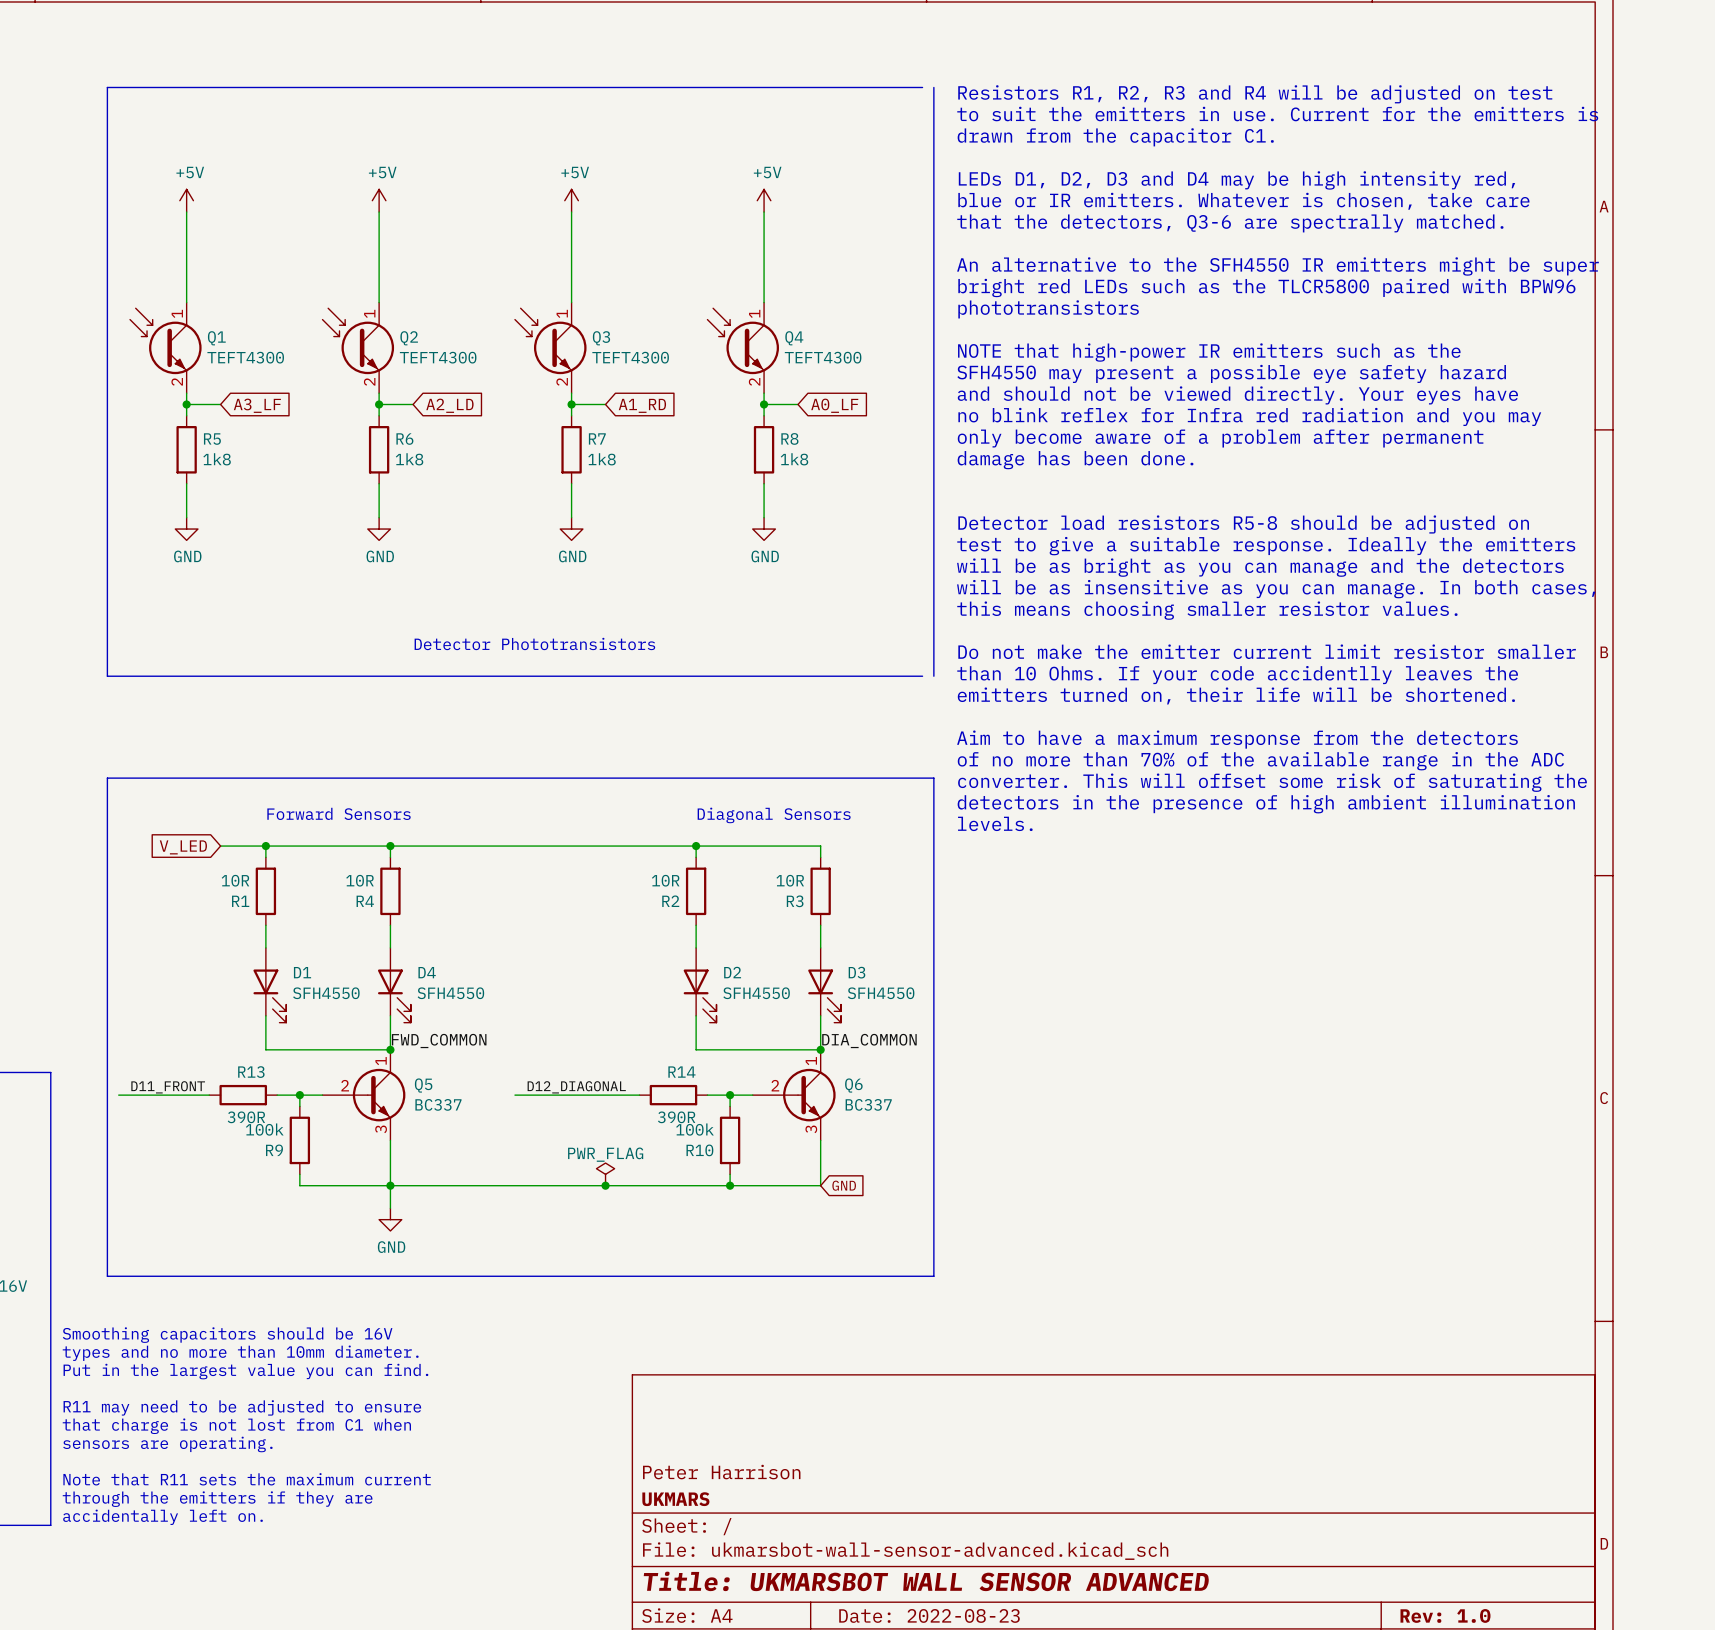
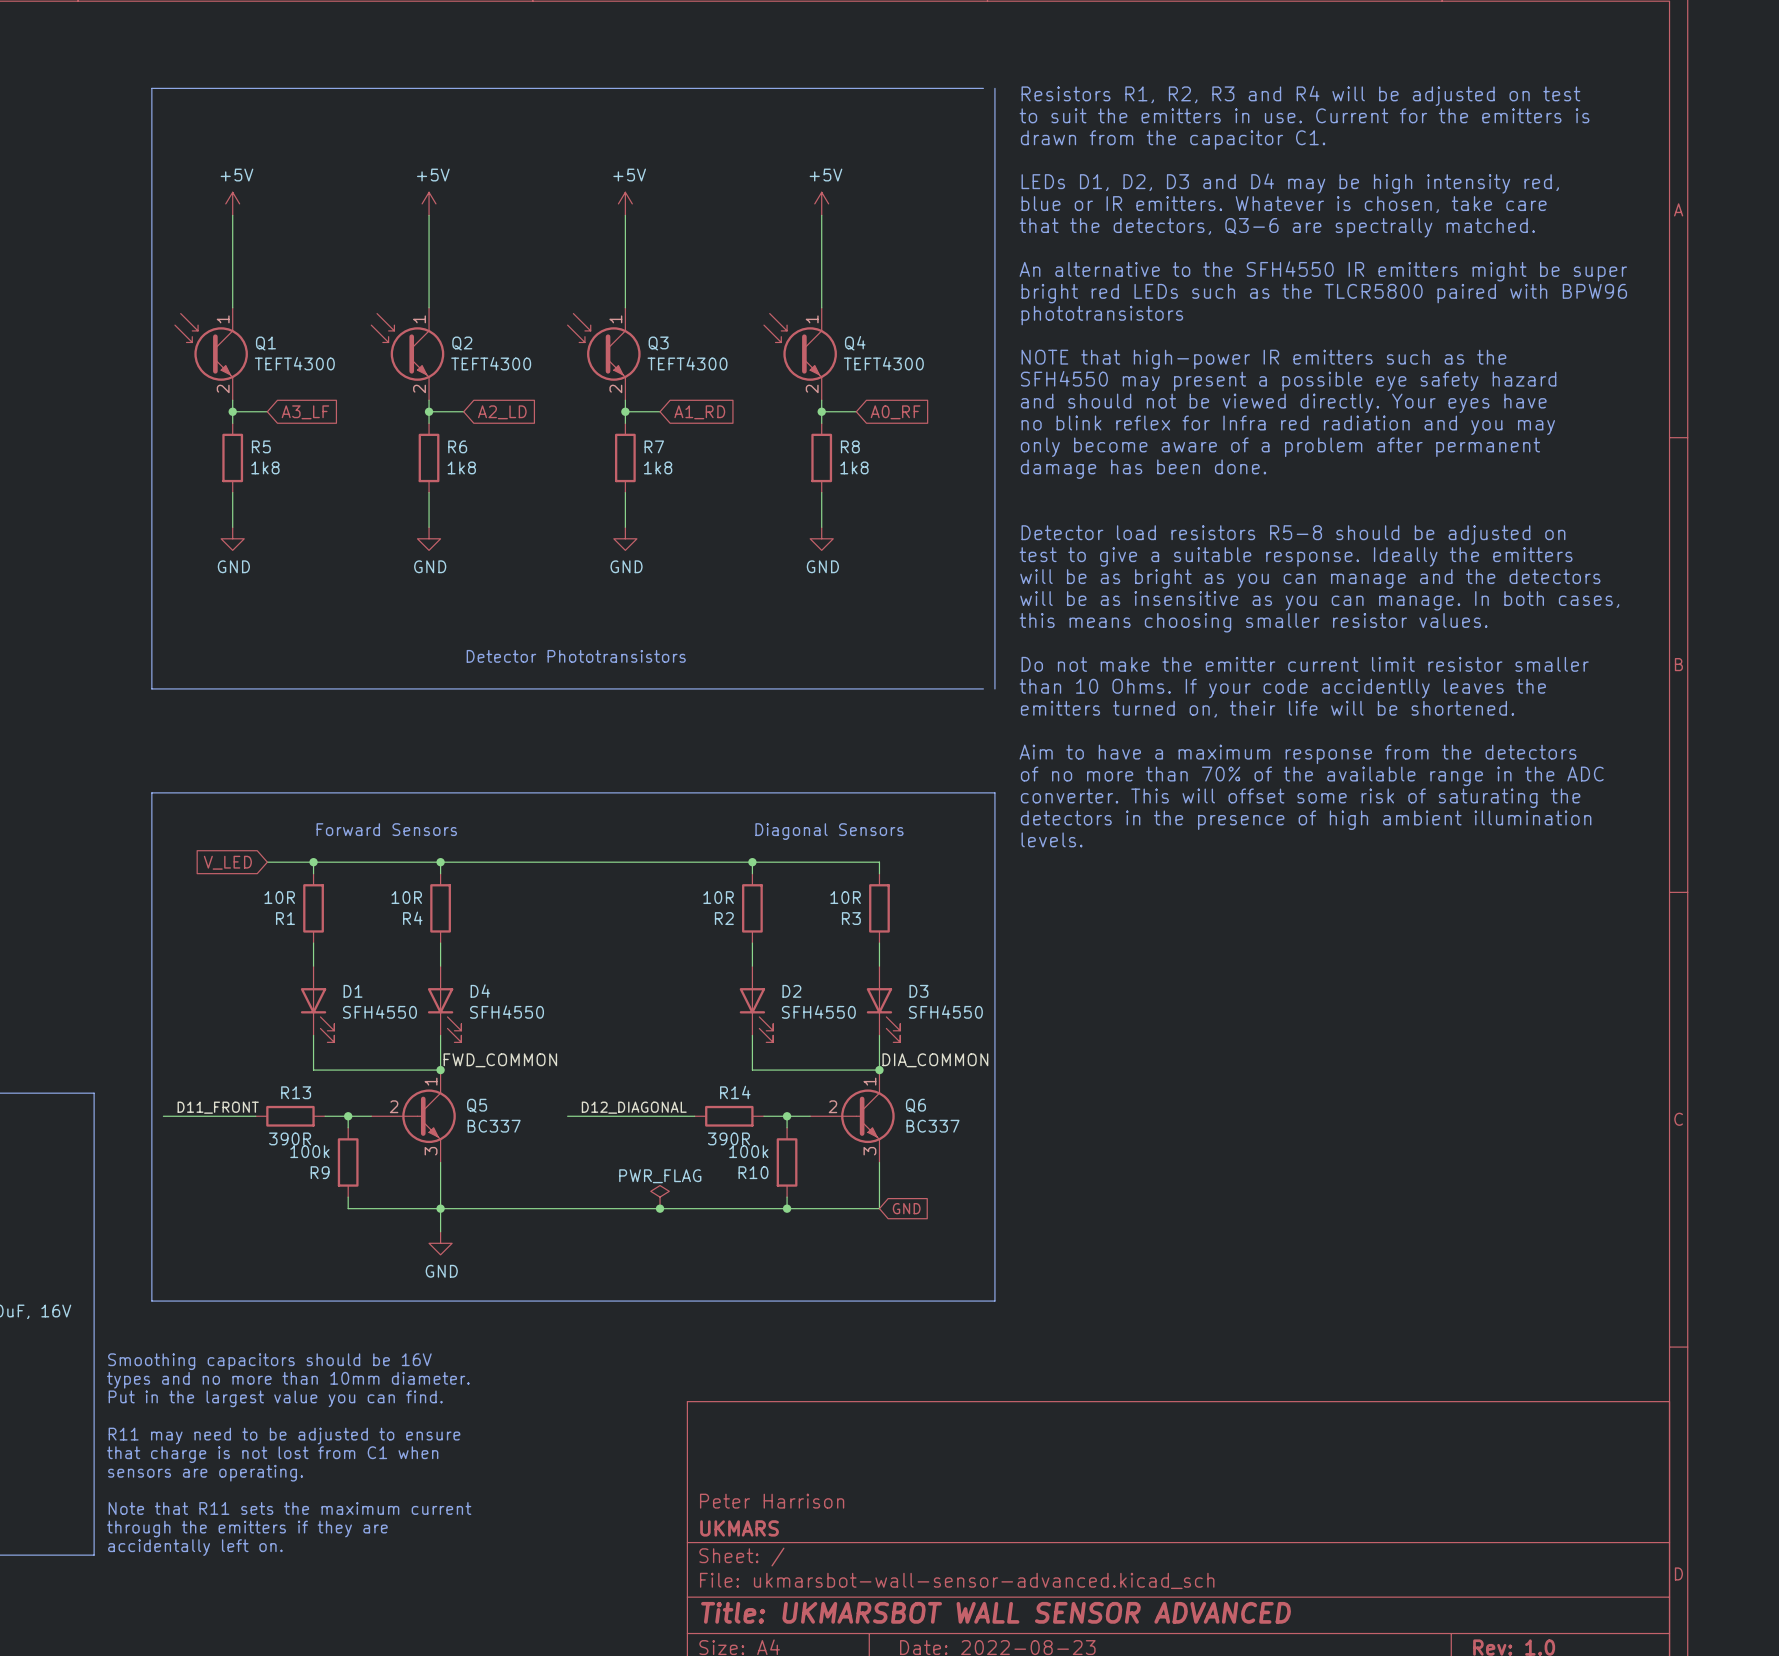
global label: A0_LF (834, 405) -> A0_RF (895, 412)

